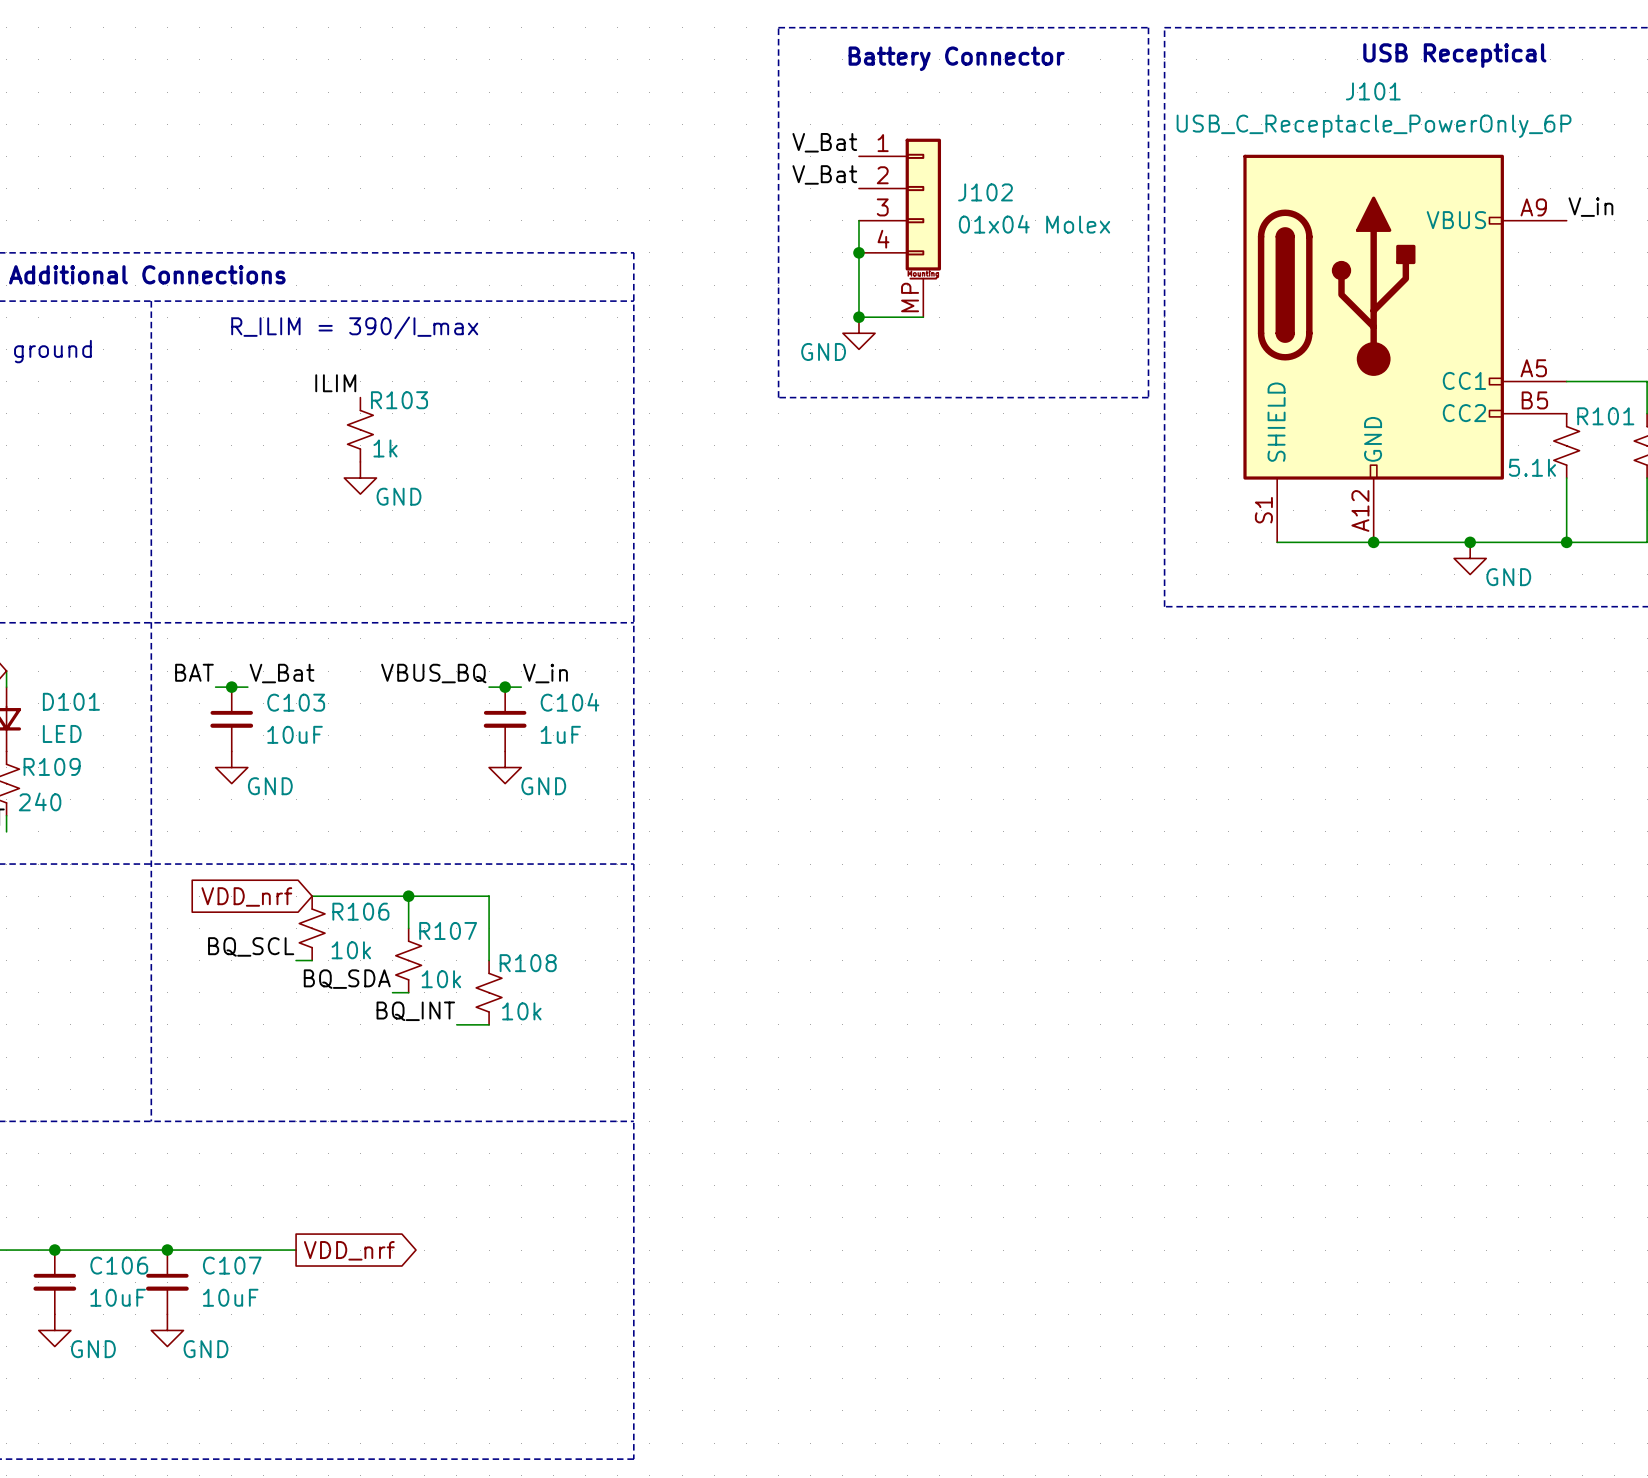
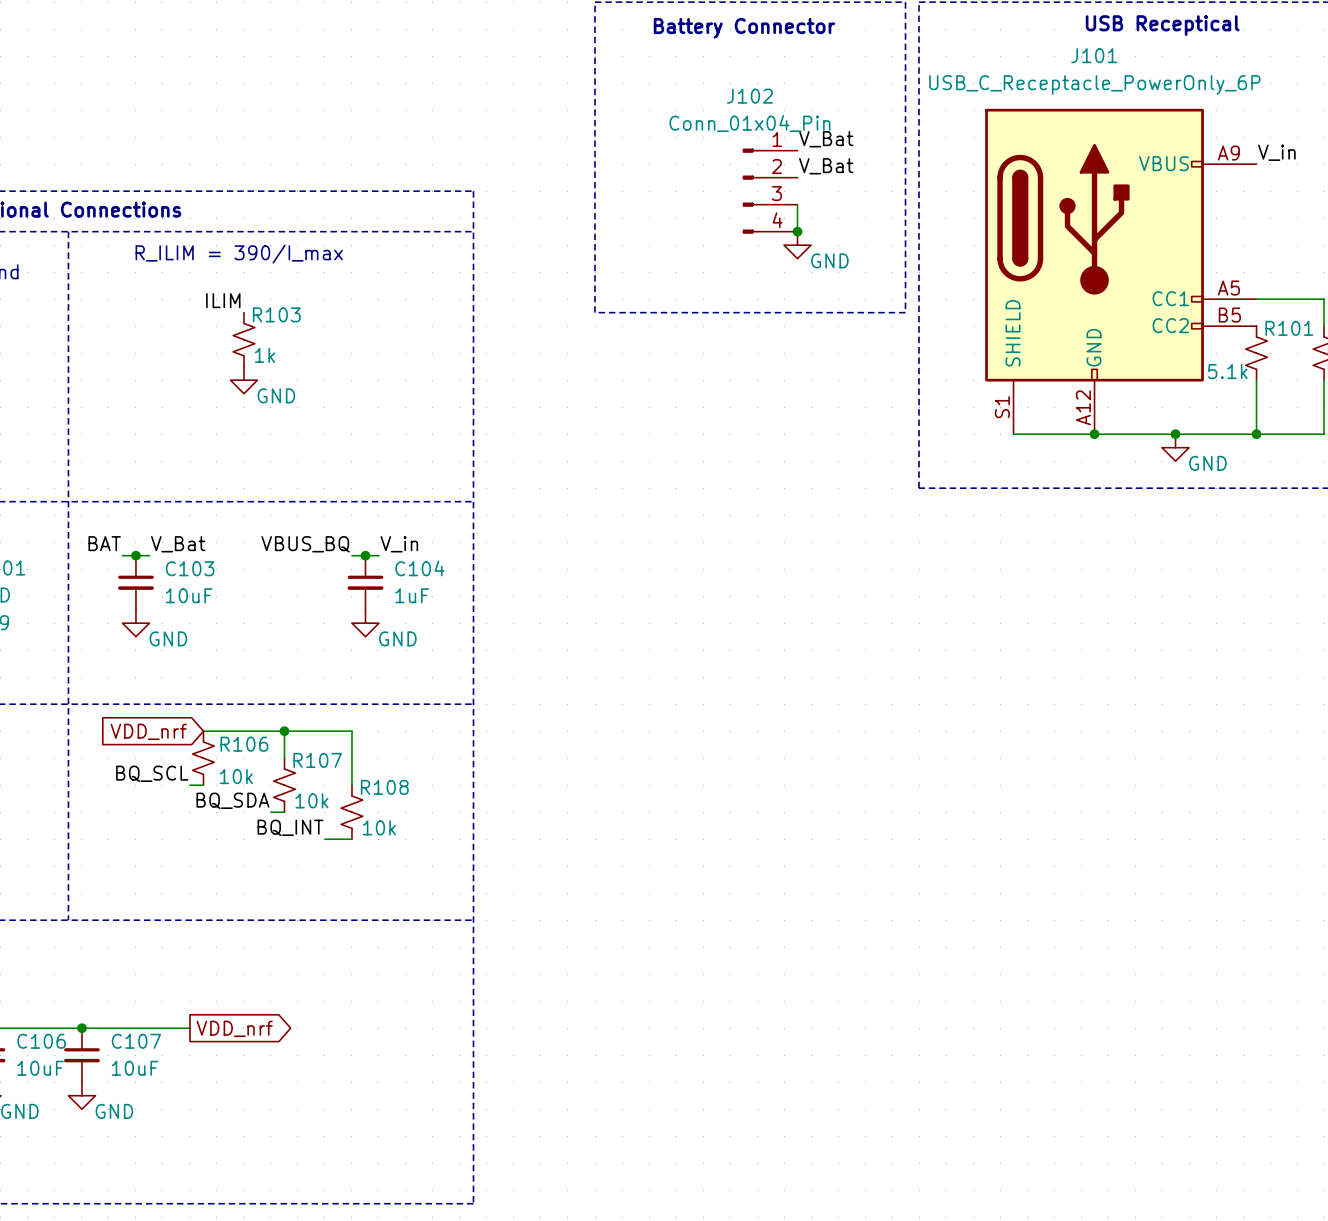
J102 symbol: [858, 138, 942, 318] -> [742, 148, 798, 234]
label: V_Bat (824, 142) -> none
label: V_Bat (824, 174) -> none
label: none -> V_Bat (826, 139)
J102 name position: J102 (985, 192) -> J102 (749, 96)
wire: (858, 220) (858, 317) (923, 317) -> none
label: none -> V_Bat (826, 166)
J102 value: 01x04 Molex (1034, 224) -> Conn_01x04_Pin (749, 123)
junction: (858, 252) -> none
wire: none -> (797, 204) (797, 231)
junction: none -> (797, 231)
junction: (858, 317) -> none
power symbol position: GND (858, 333) -> GND (797, 245)
power symbol text position: GND (823, 351) -> GND (829, 260)

